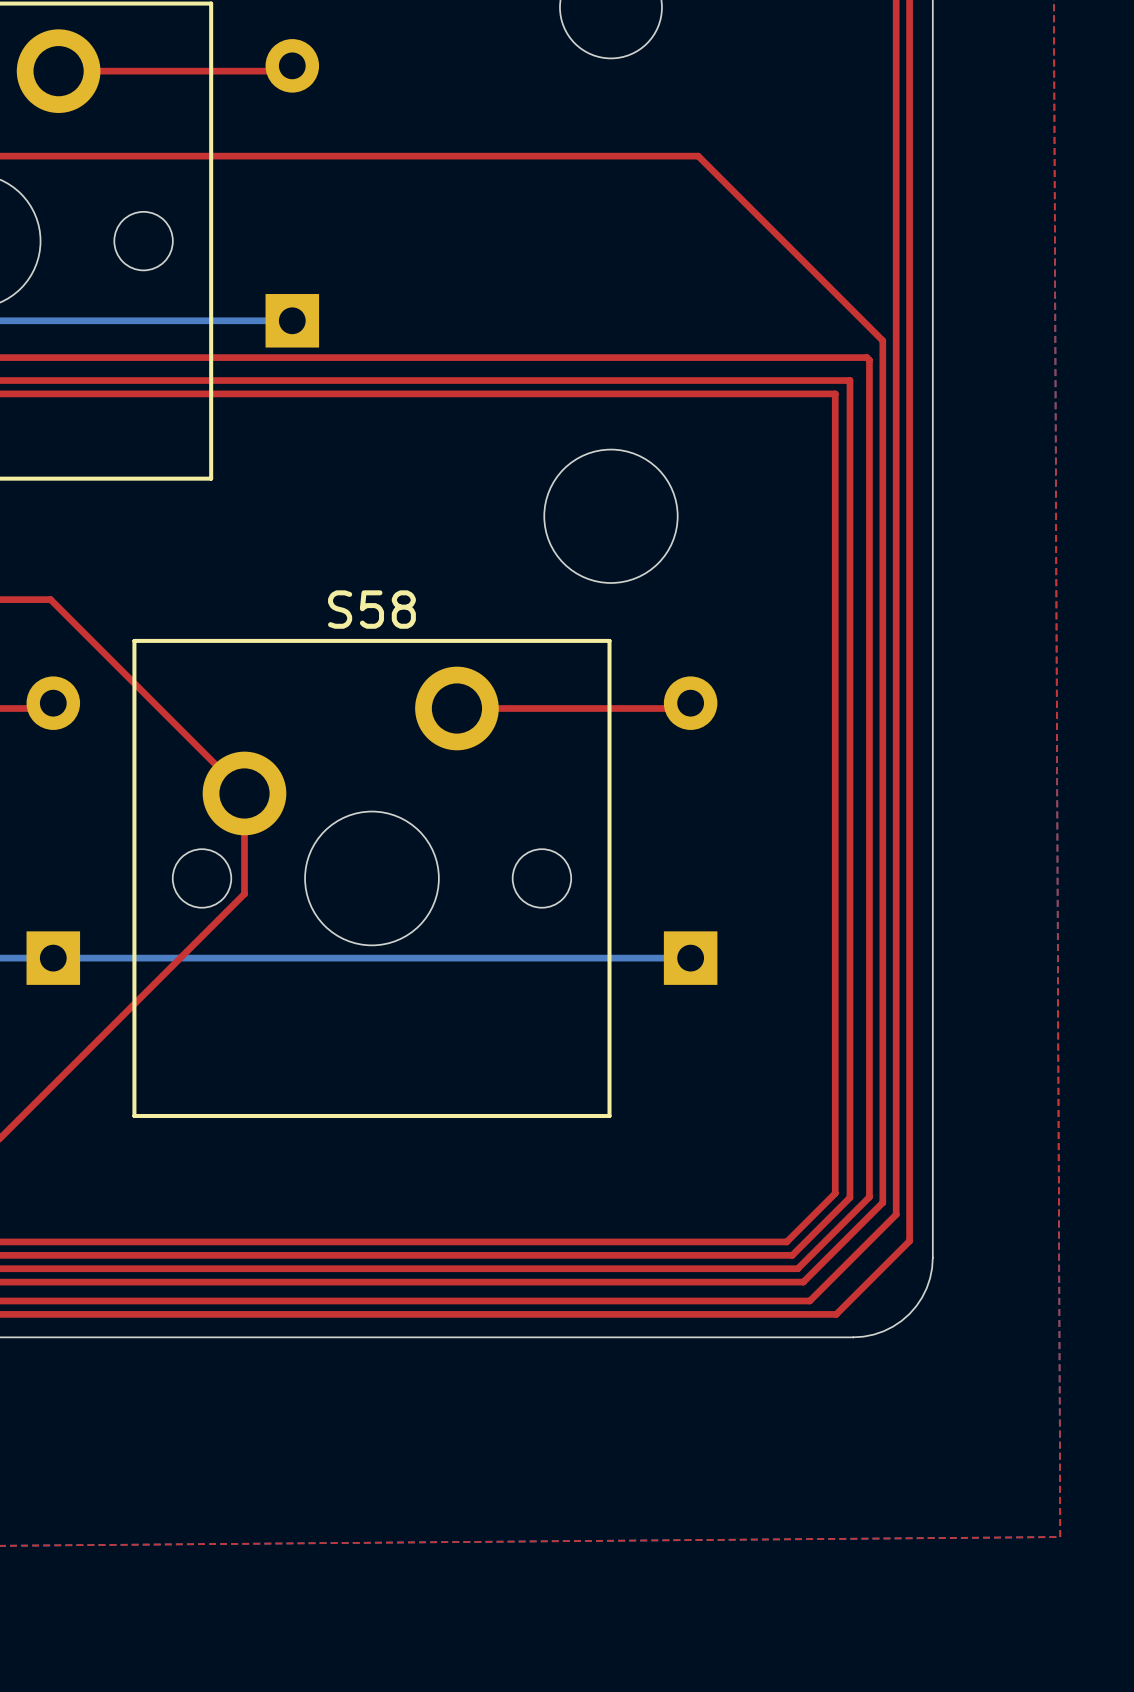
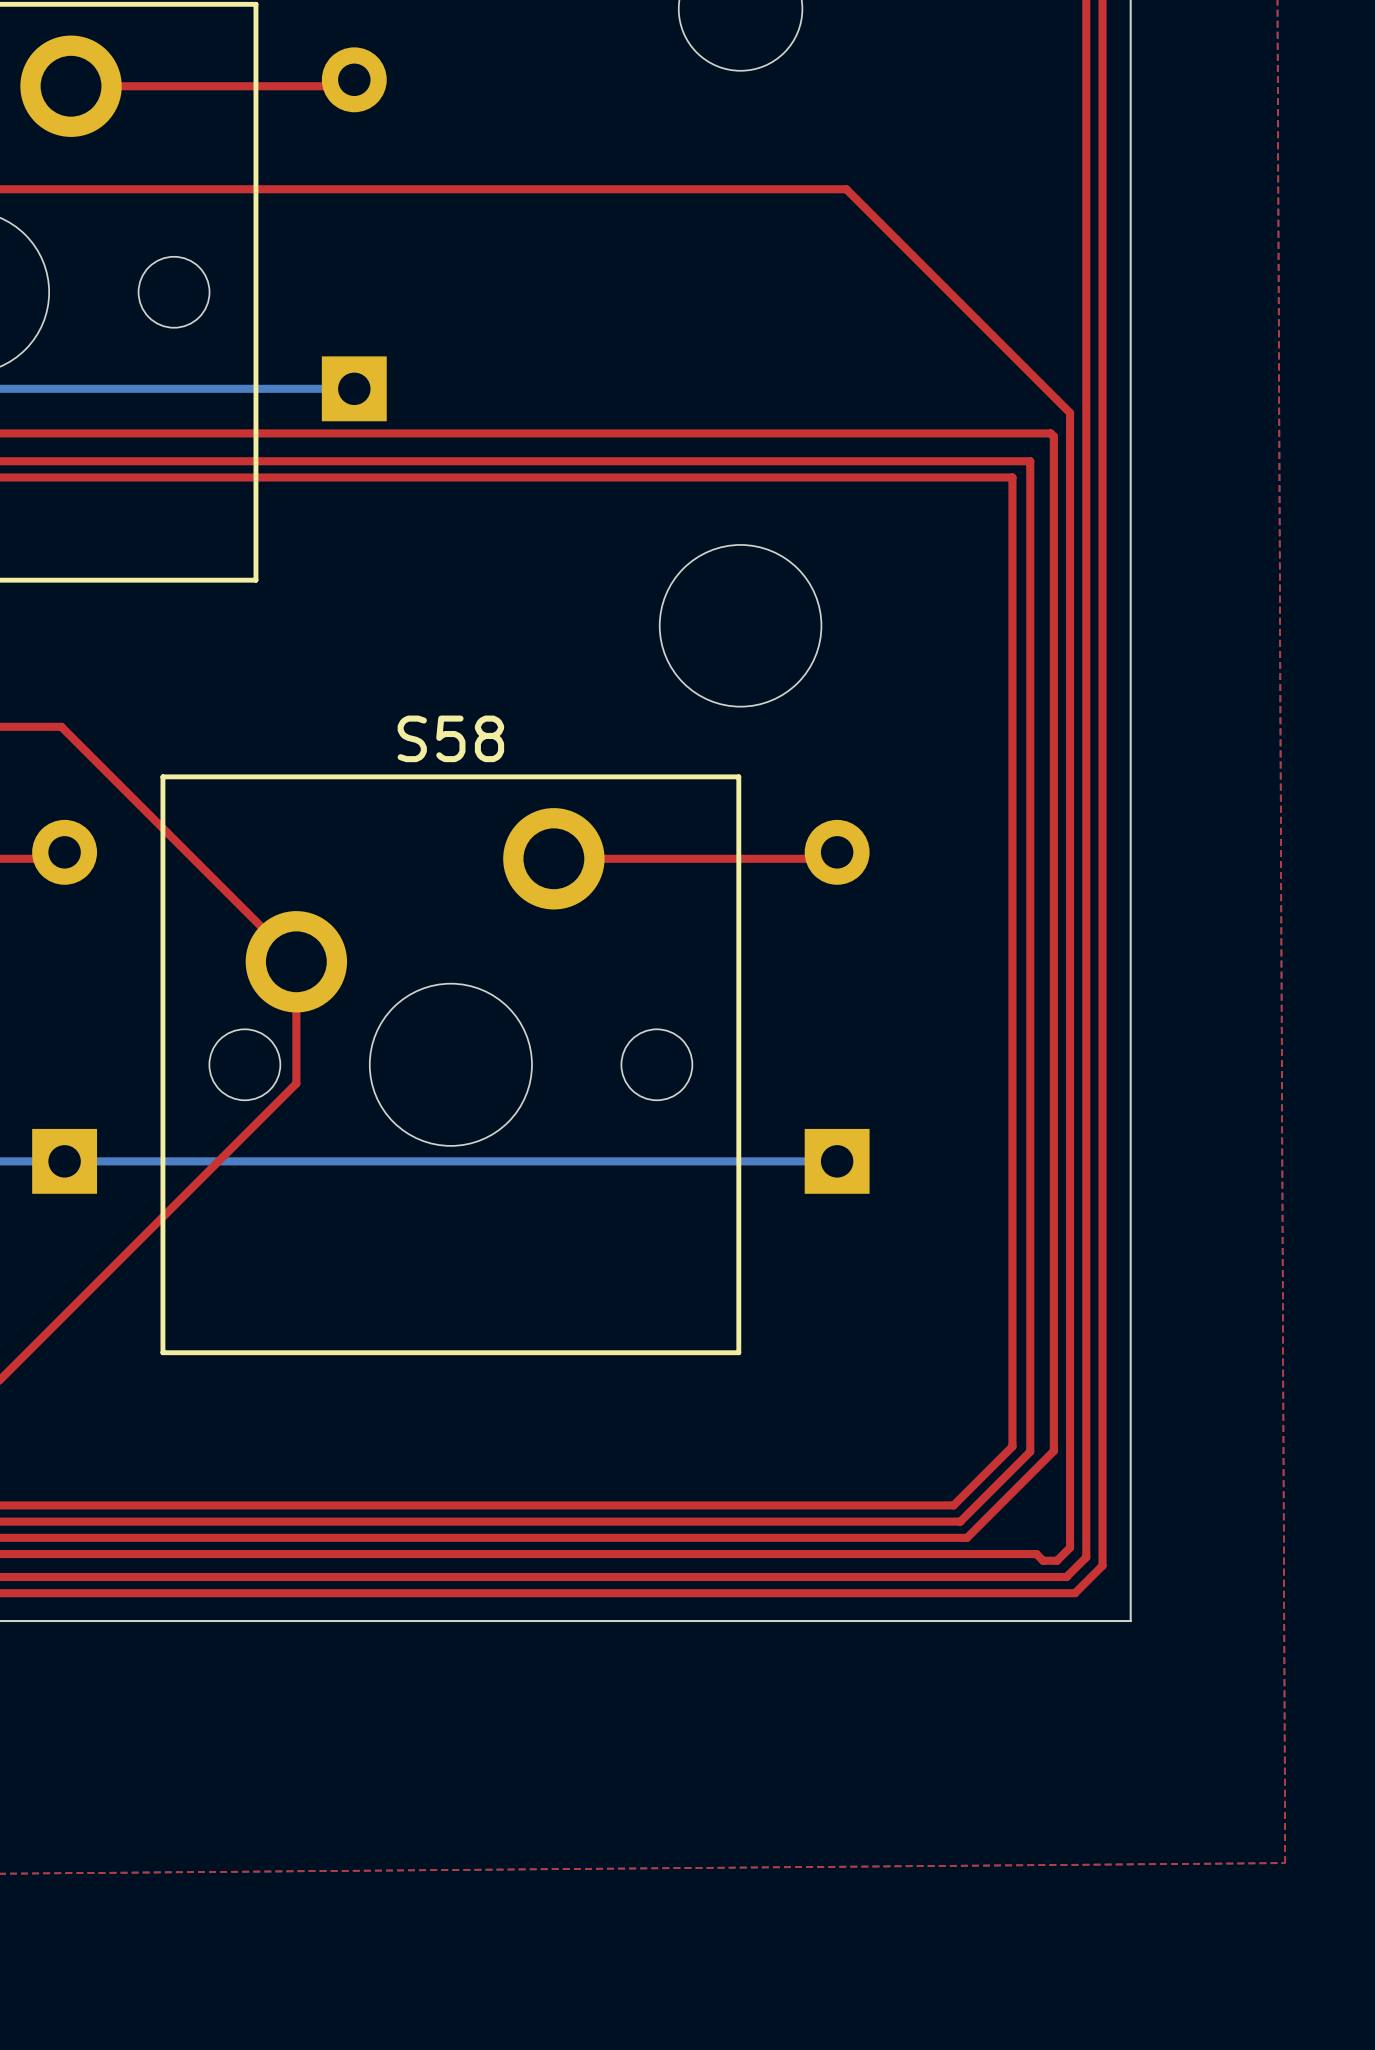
top track: (882, 1202) (803, 1282) -> (1070, 1457) (1070, 1547) (1057, 1560) (1043, 1560) (1036, 1554) (973, 1554)
top track: (896, 1214) (809, 1301) -> (1086, 1472) (1086, 1557) (1066, 1576) (981, 1576)
top track: (909, 1241) (836, 1314) -> (1102, 1504) (1102, 1565) (1075, 1593) (1013, 1593)
board edge: (932, 1257) (926, 1288) (909, 1314) (883, 1331) (853, 1337) -> (1130, 1524) (1130, 1621) (1034, 1621)

